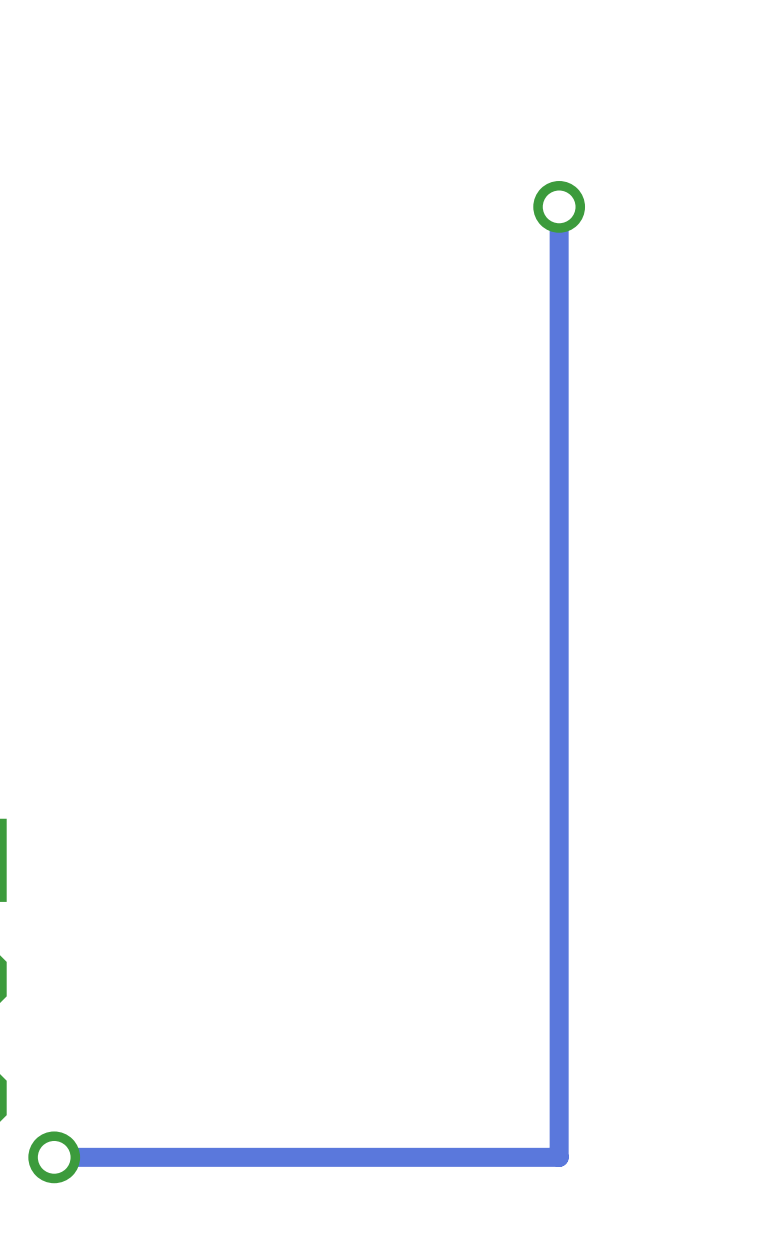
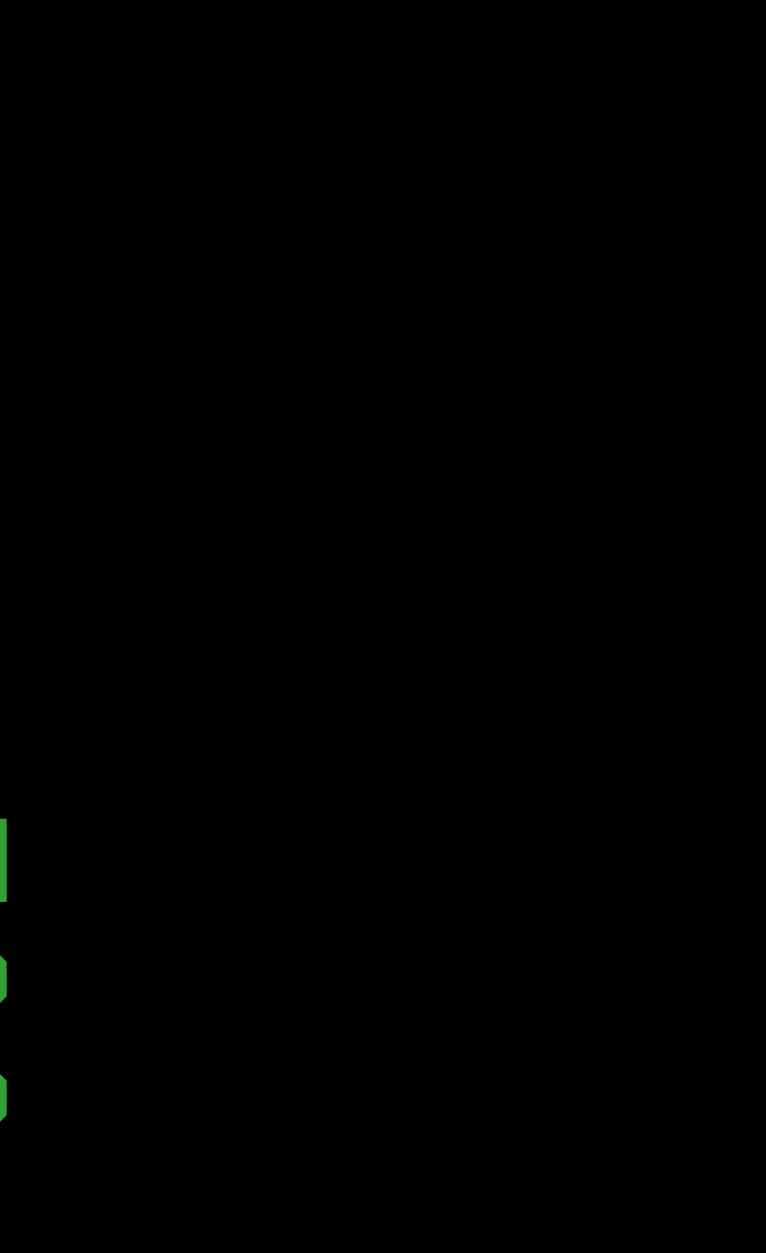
track: (559, 206) (559, 1157) (54, 1157) -> none
via: (559, 206) -> none
via: (54, 1157) -> none

